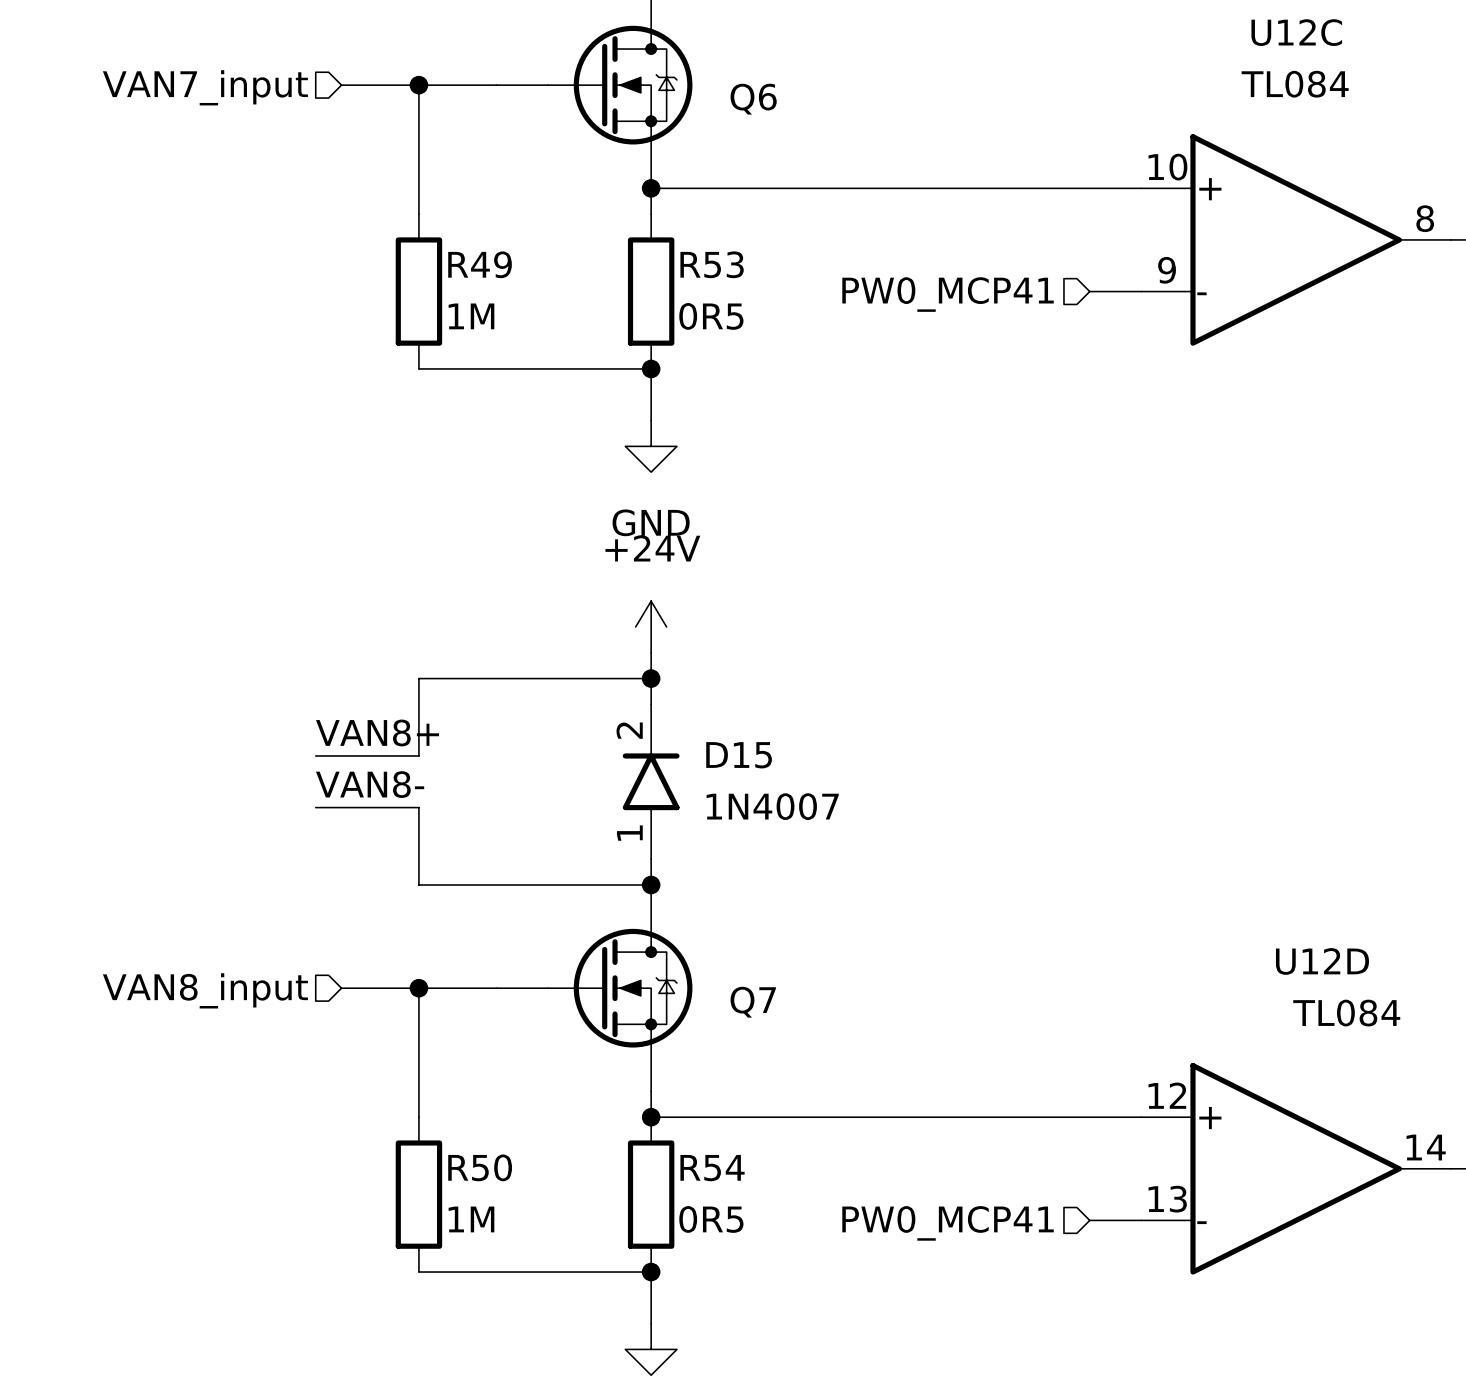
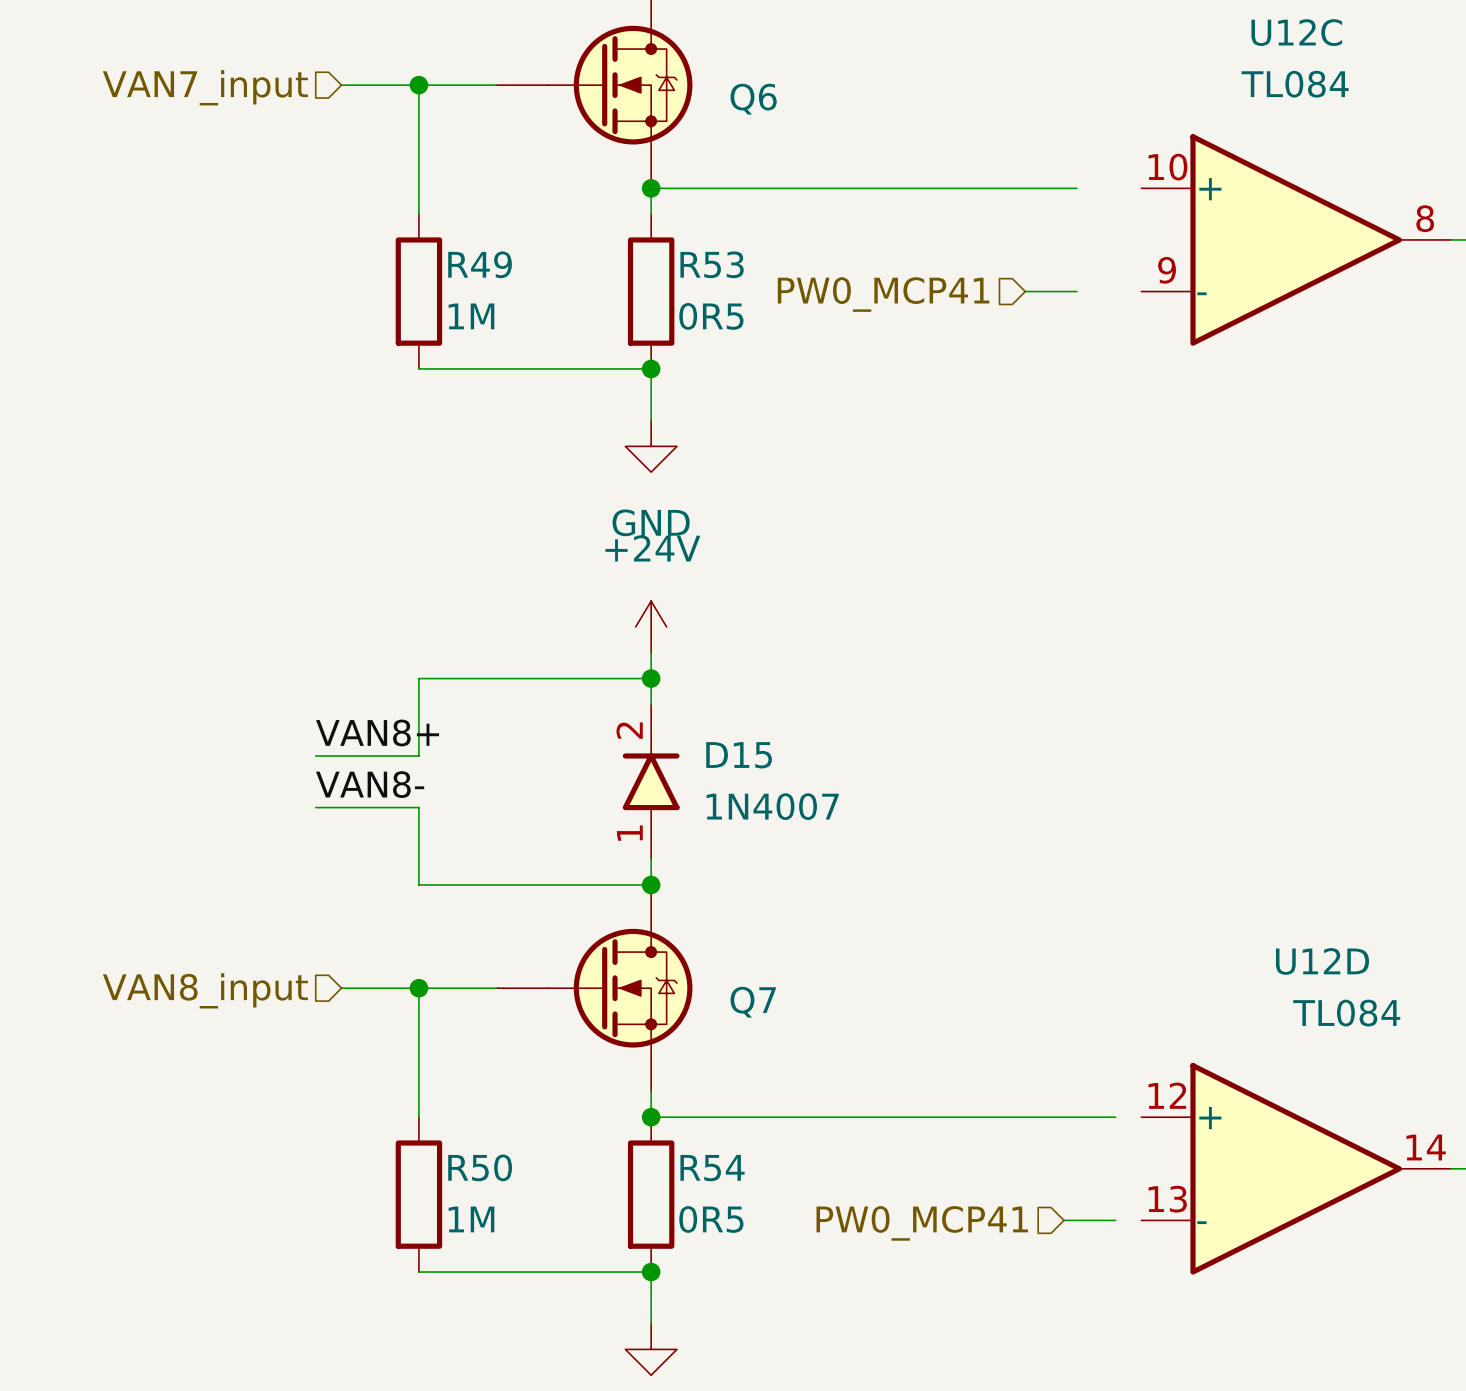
wire: (1076, 188) (1141, 188) -> none
wire: (1089, 291) (1141, 291) -> (1025, 291) (1076, 291)
hierarchical label position: PW0_MCP41 (948, 294) -> PW0_MCP41 (883, 294)
wire: (1115, 1117) (1141, 1117) -> none
wire: (1115, 1220) (1141, 1220) -> (1063, 1220) (1089, 1220)
hierarchical label position: PW0_MCP41 (948, 1223) -> PW0_MCP41 (922, 1223)

